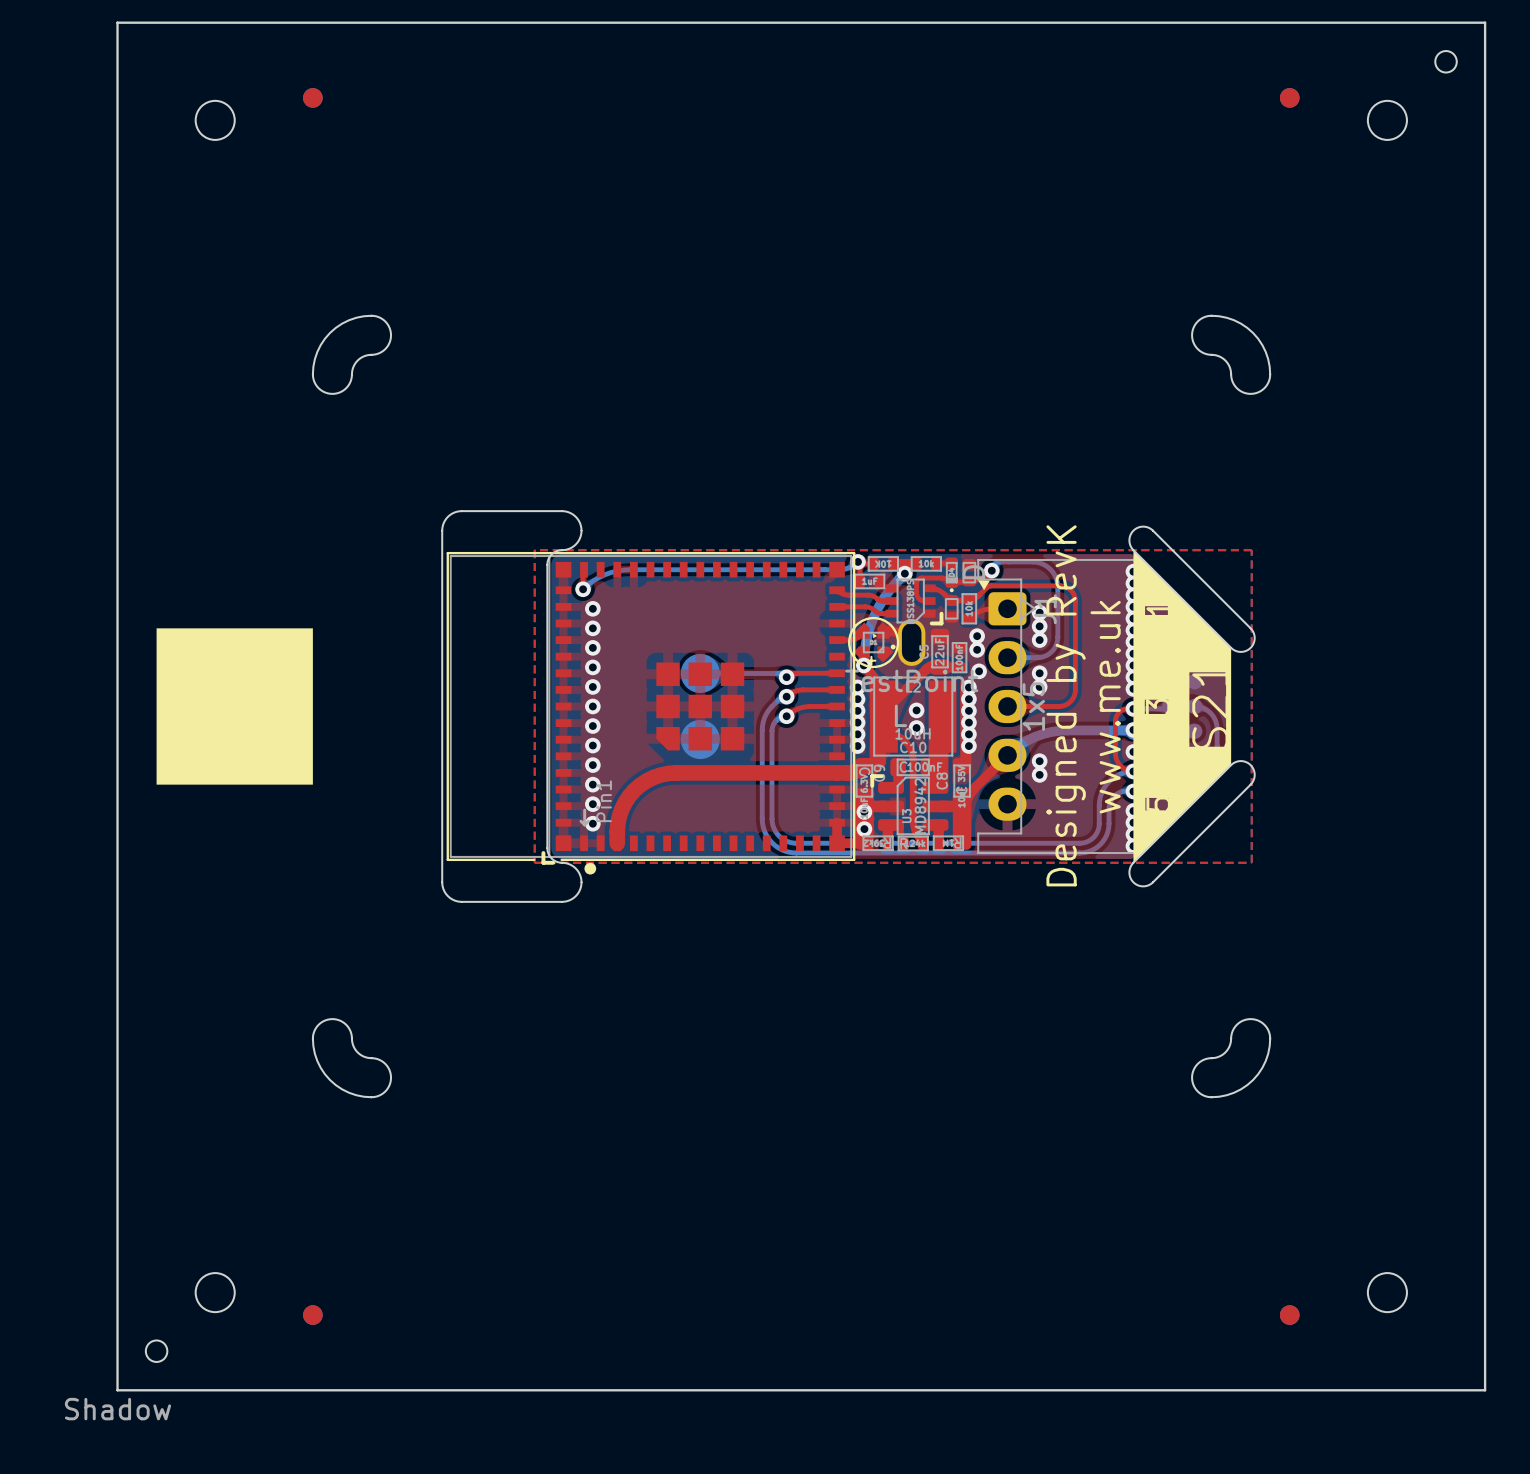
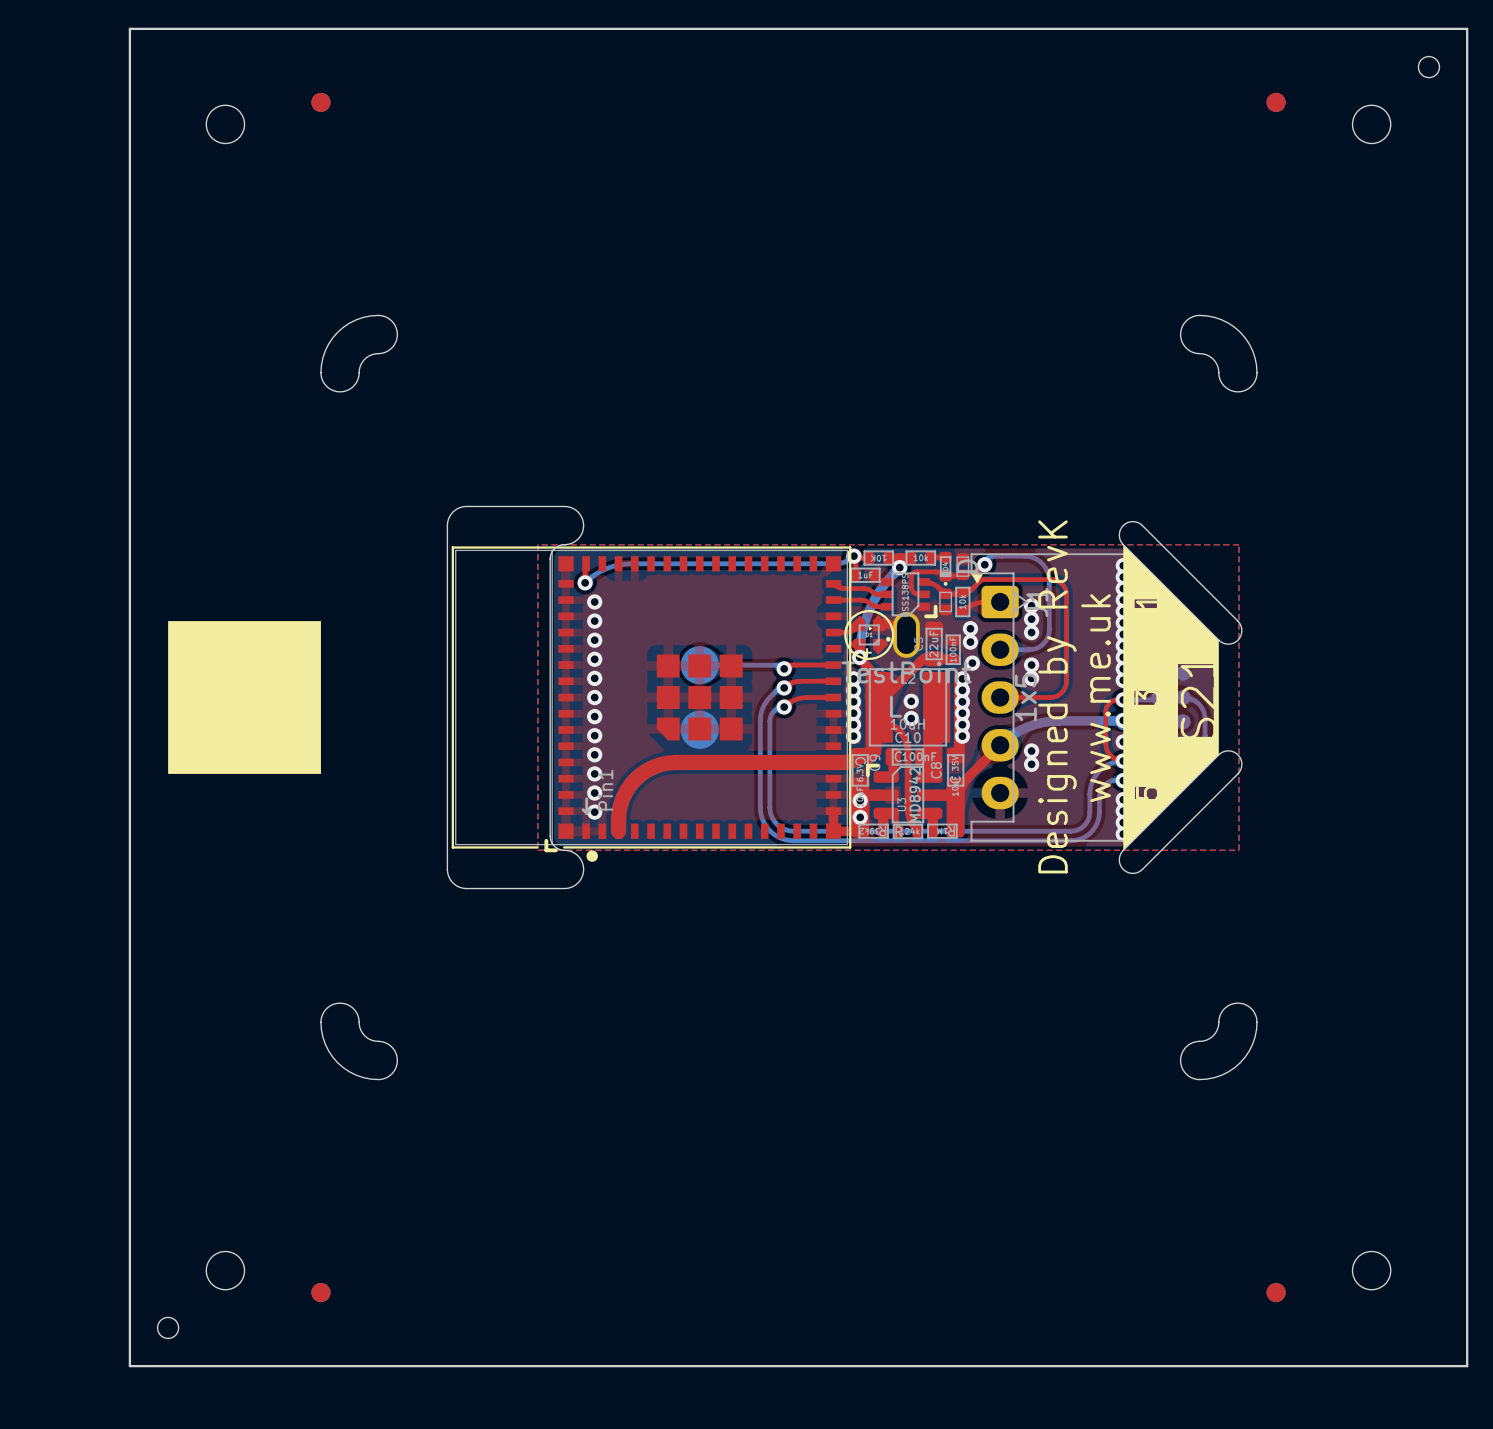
drawing: [64, 1397, 172, 1421] -> none

